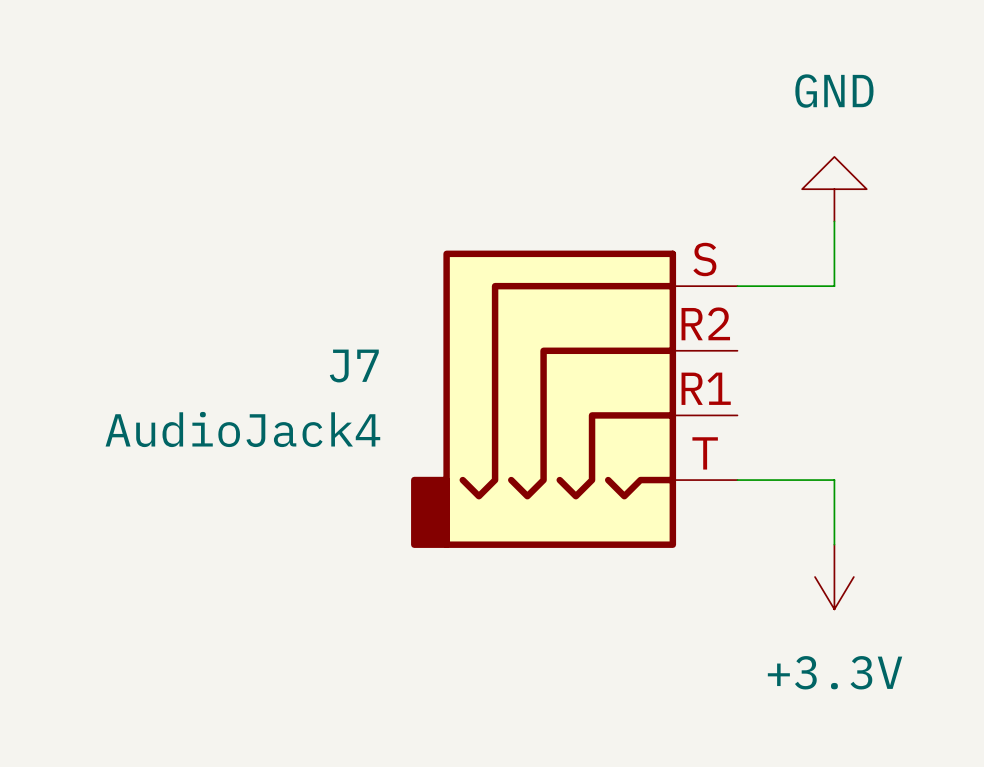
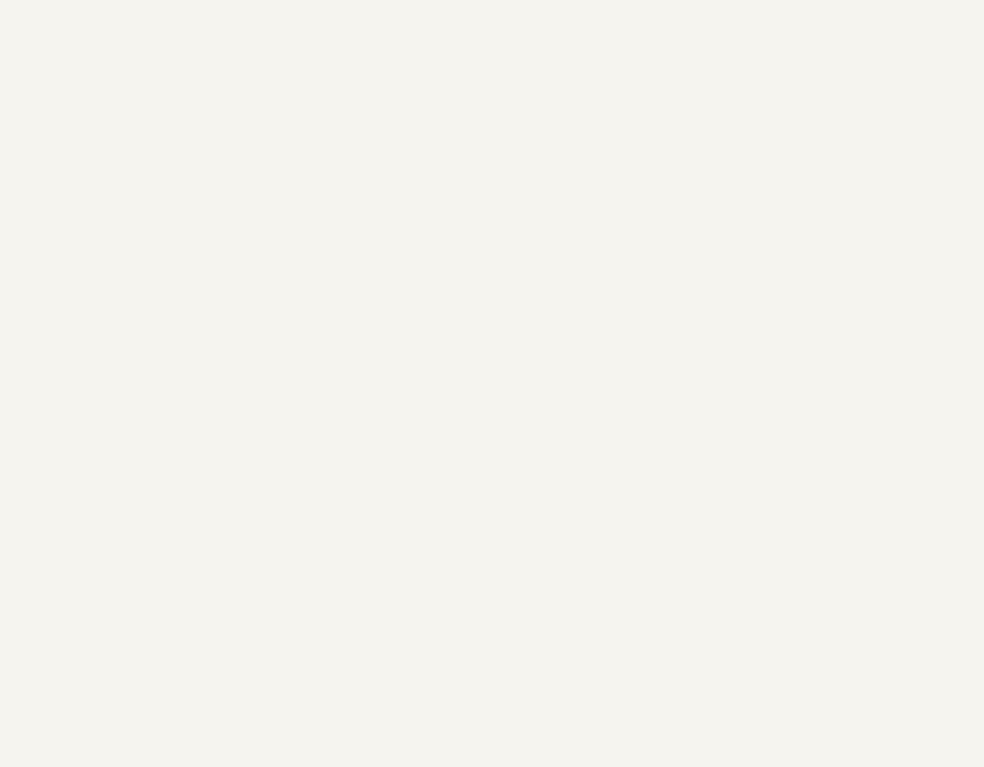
power symbol: GND (834, 189) -> none
wire: (834, 221) (834, 286) (737, 286) -> none
J7: AudioJack4 (574, 399) -> none
wire: (737, 480) (834, 480) (834, 544) -> none
power symbol: +3.3V (834, 577) -> none

